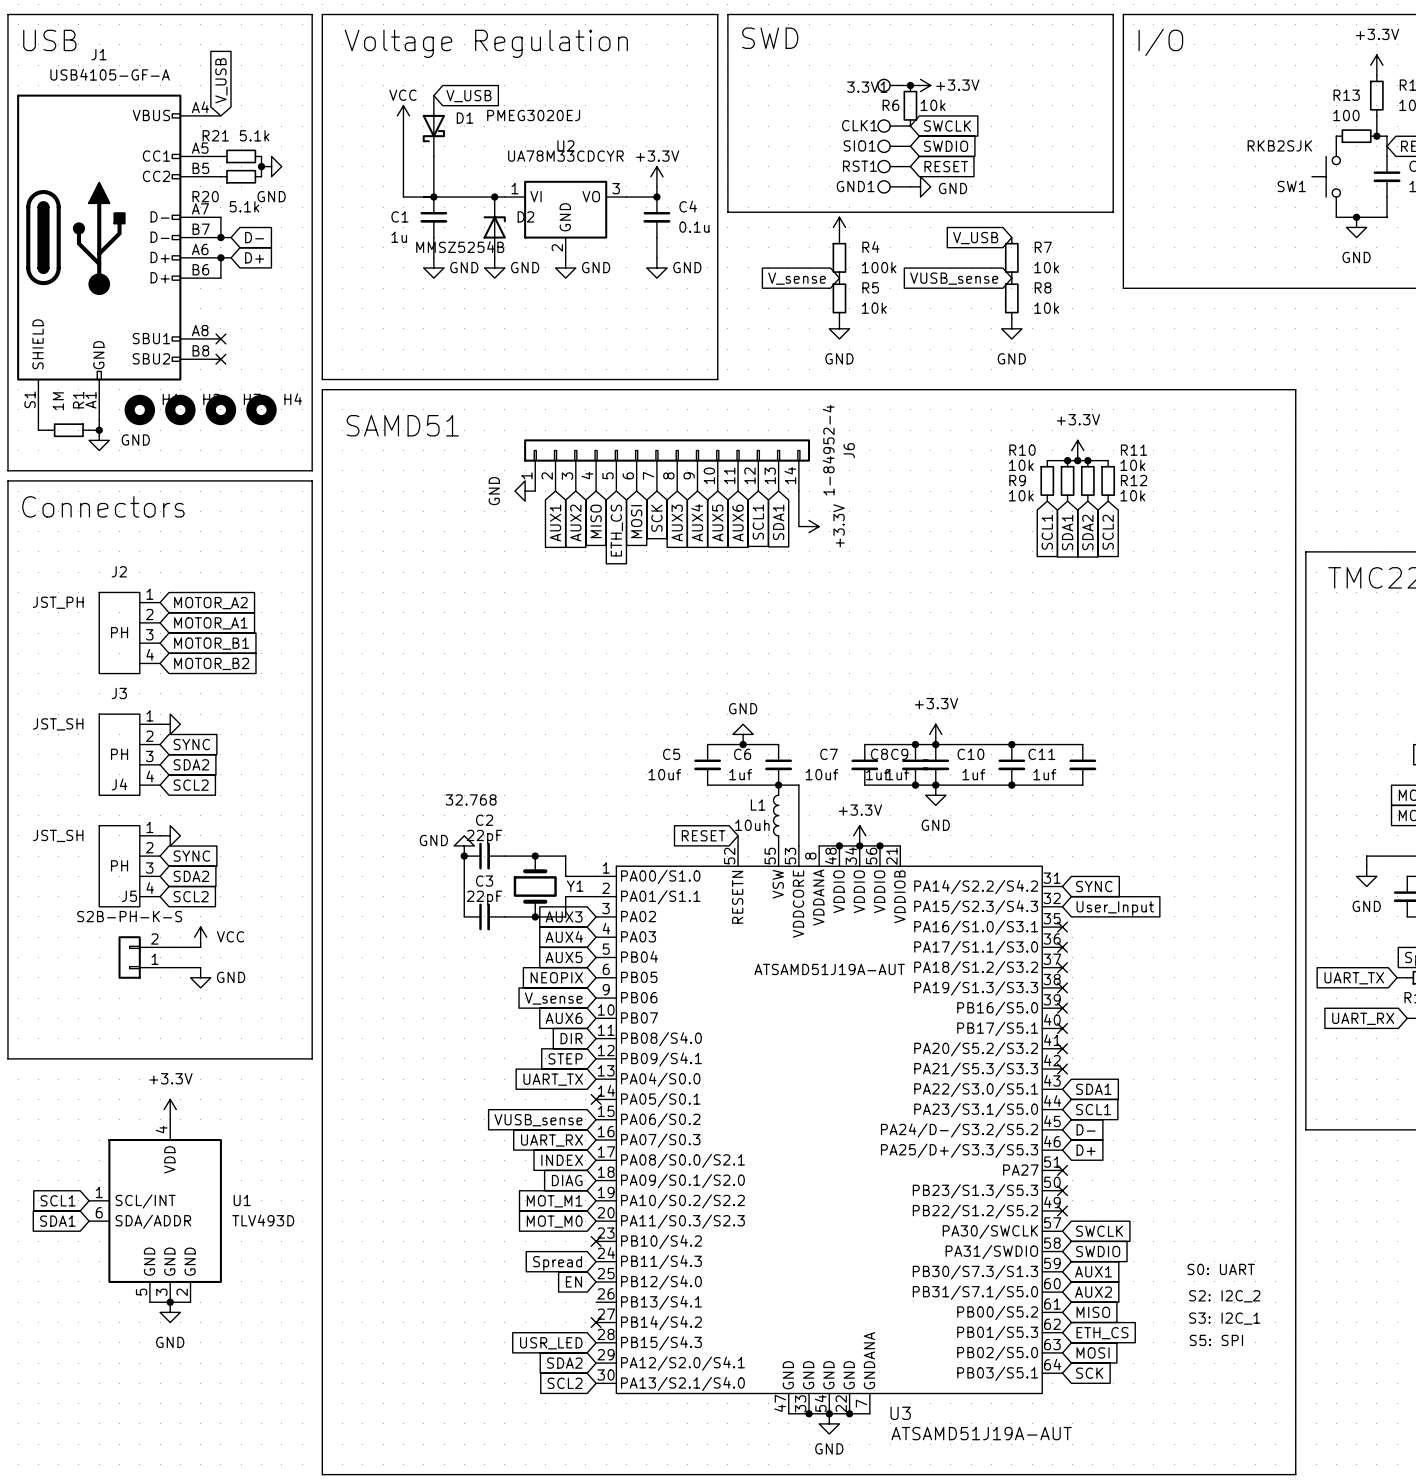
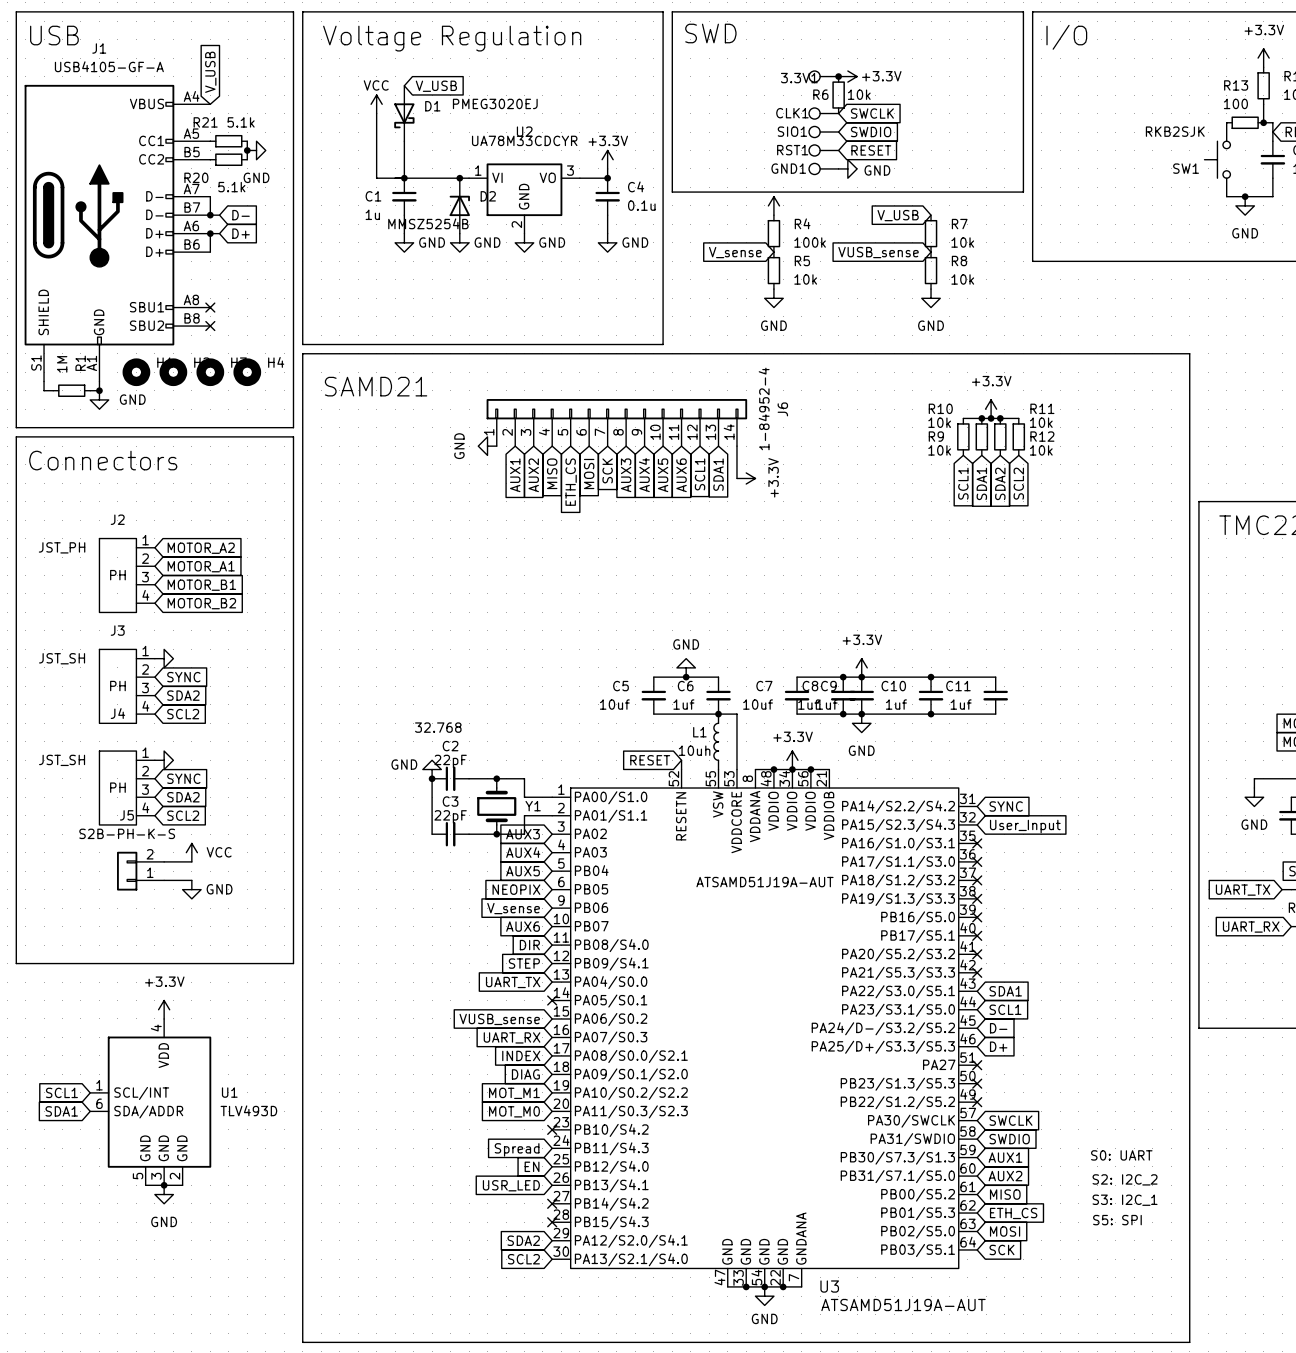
text: SAMD51 (402, 425) -> SAMD21 (376, 386)
no-connect mark: none -> (552, 1222)
global label position: USR_LED (551, 1343) -> USR_LED (511, 1185)

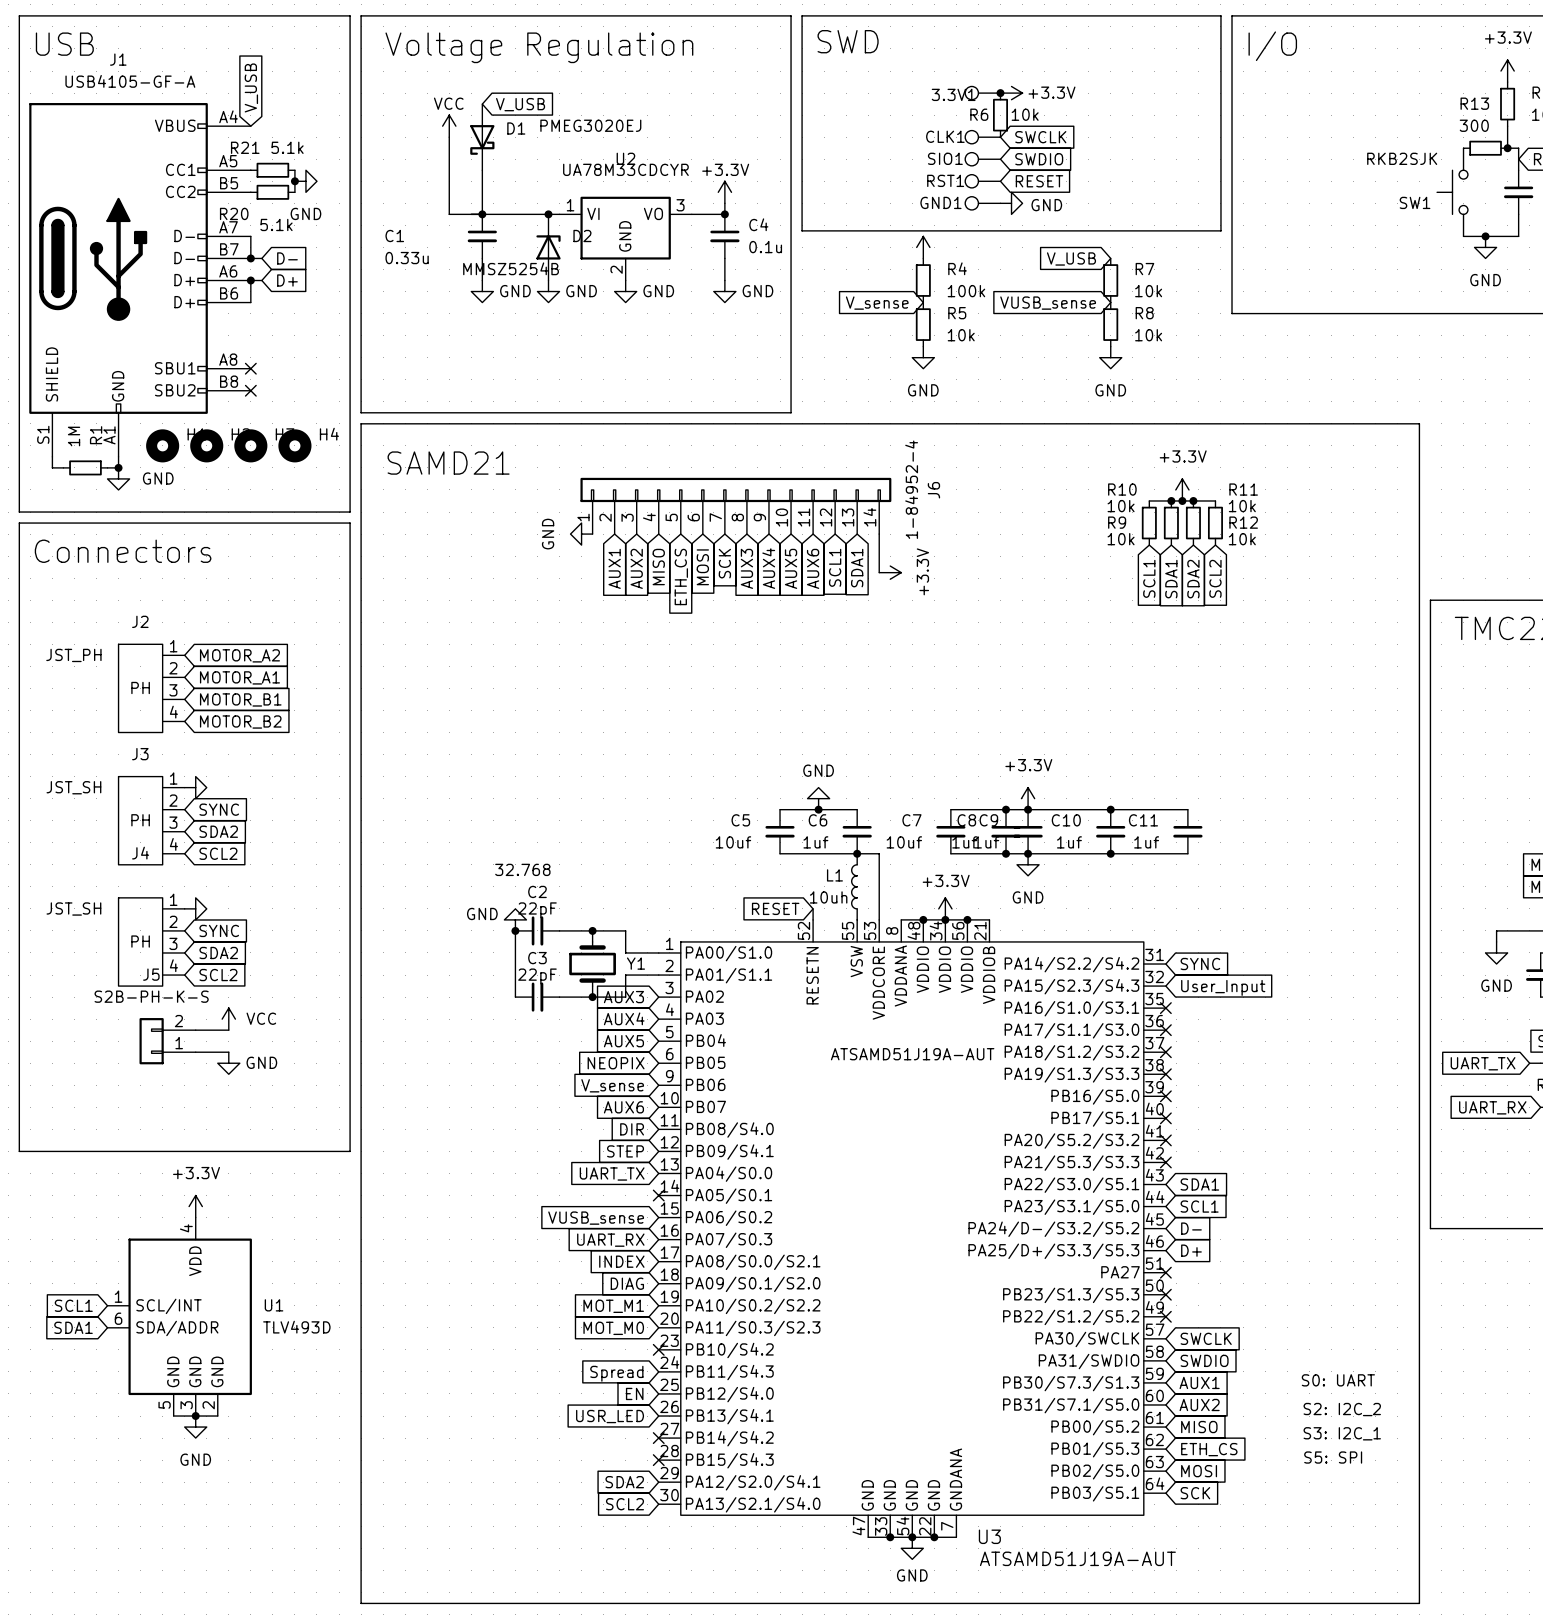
R13 value: 100 (1235, 103) -> 300 (1474, 125)
C1 name position: C1 (373, 196) -> C1 (394, 235)
C1 value: 1u (372, 214) -> 0.33u (407, 258)

